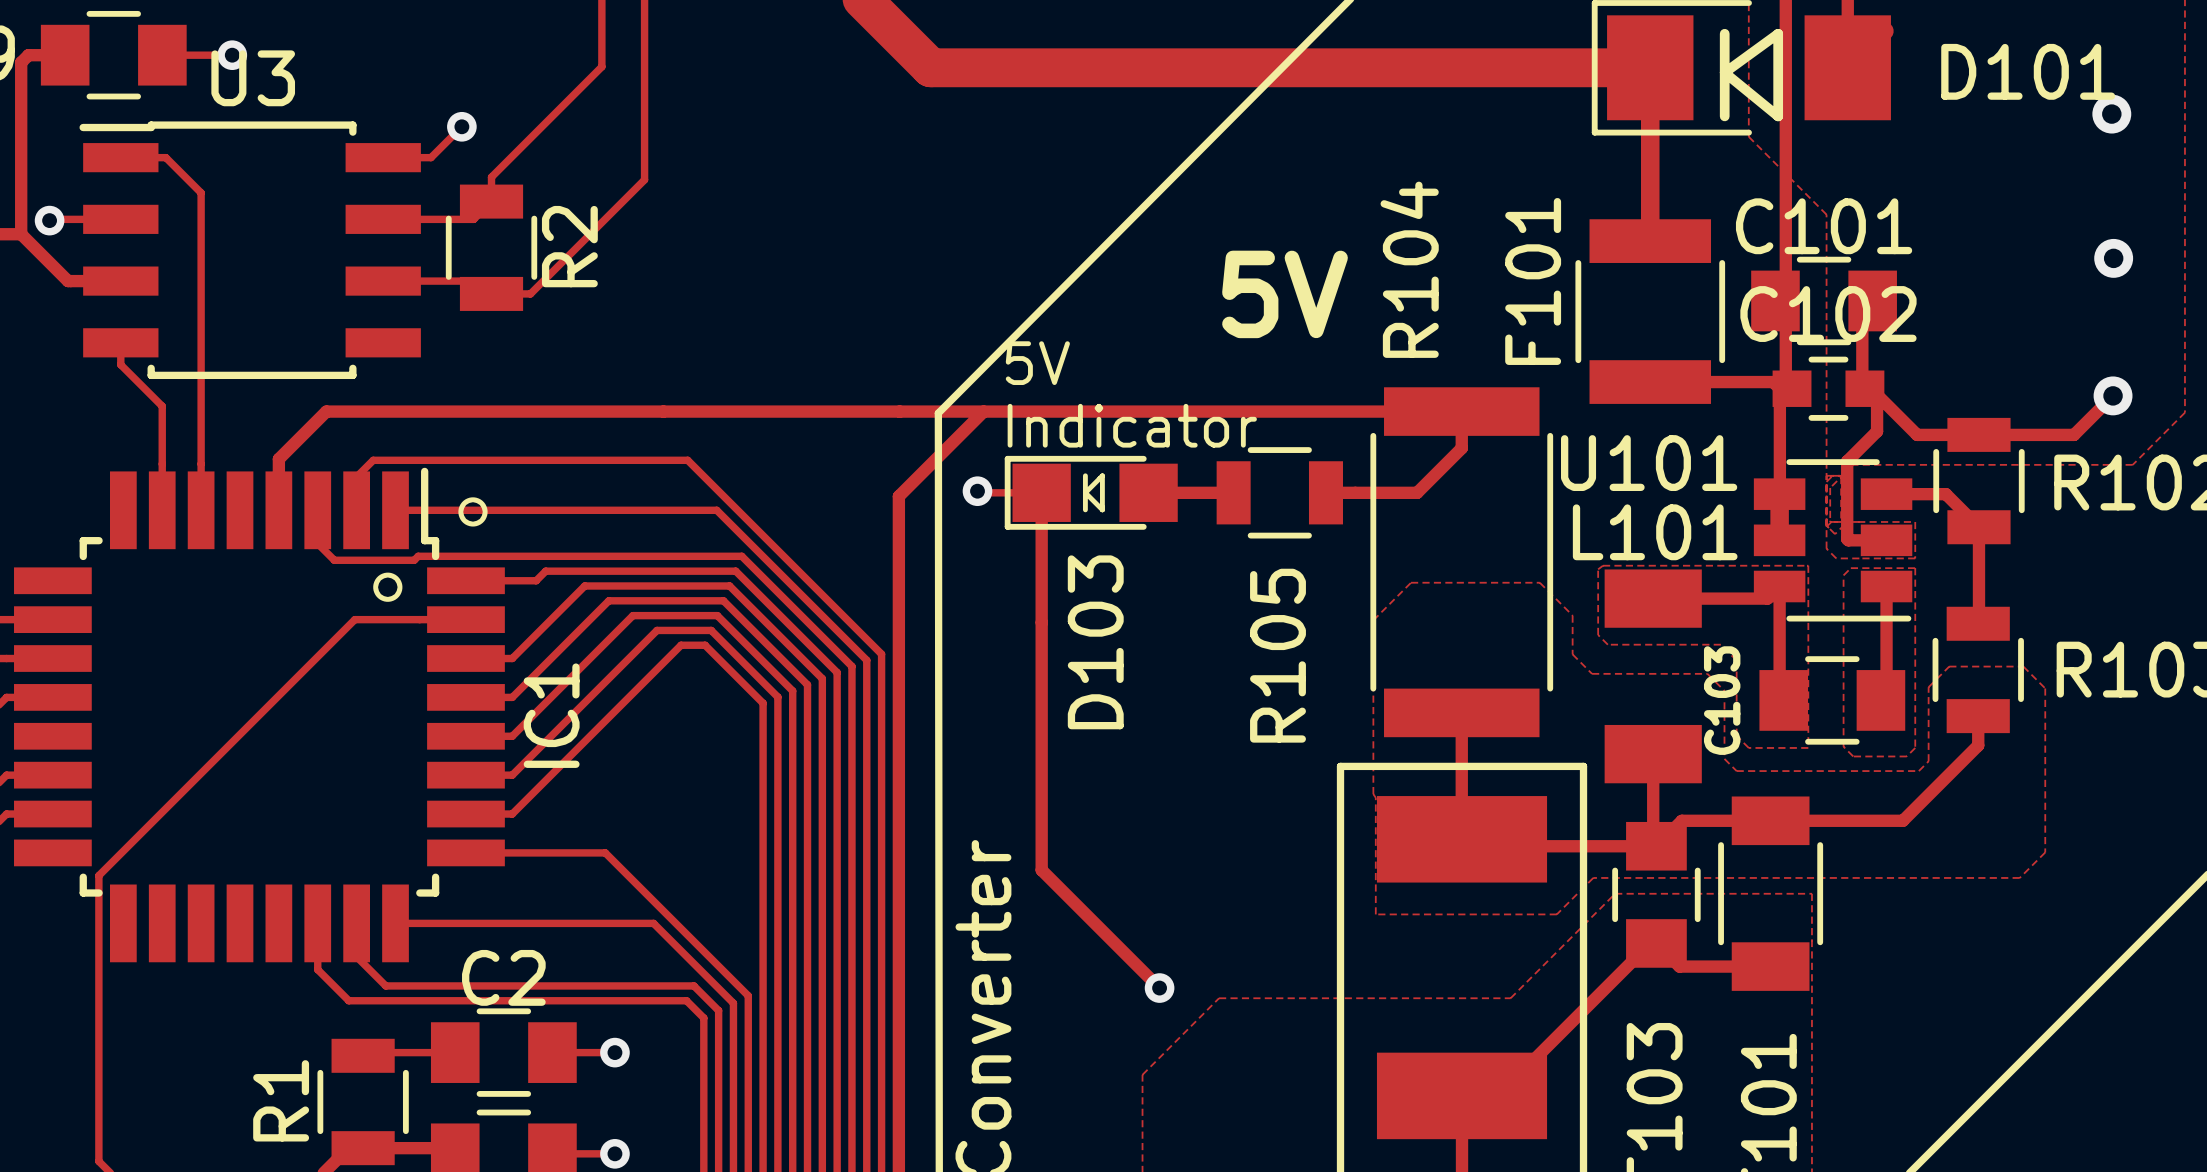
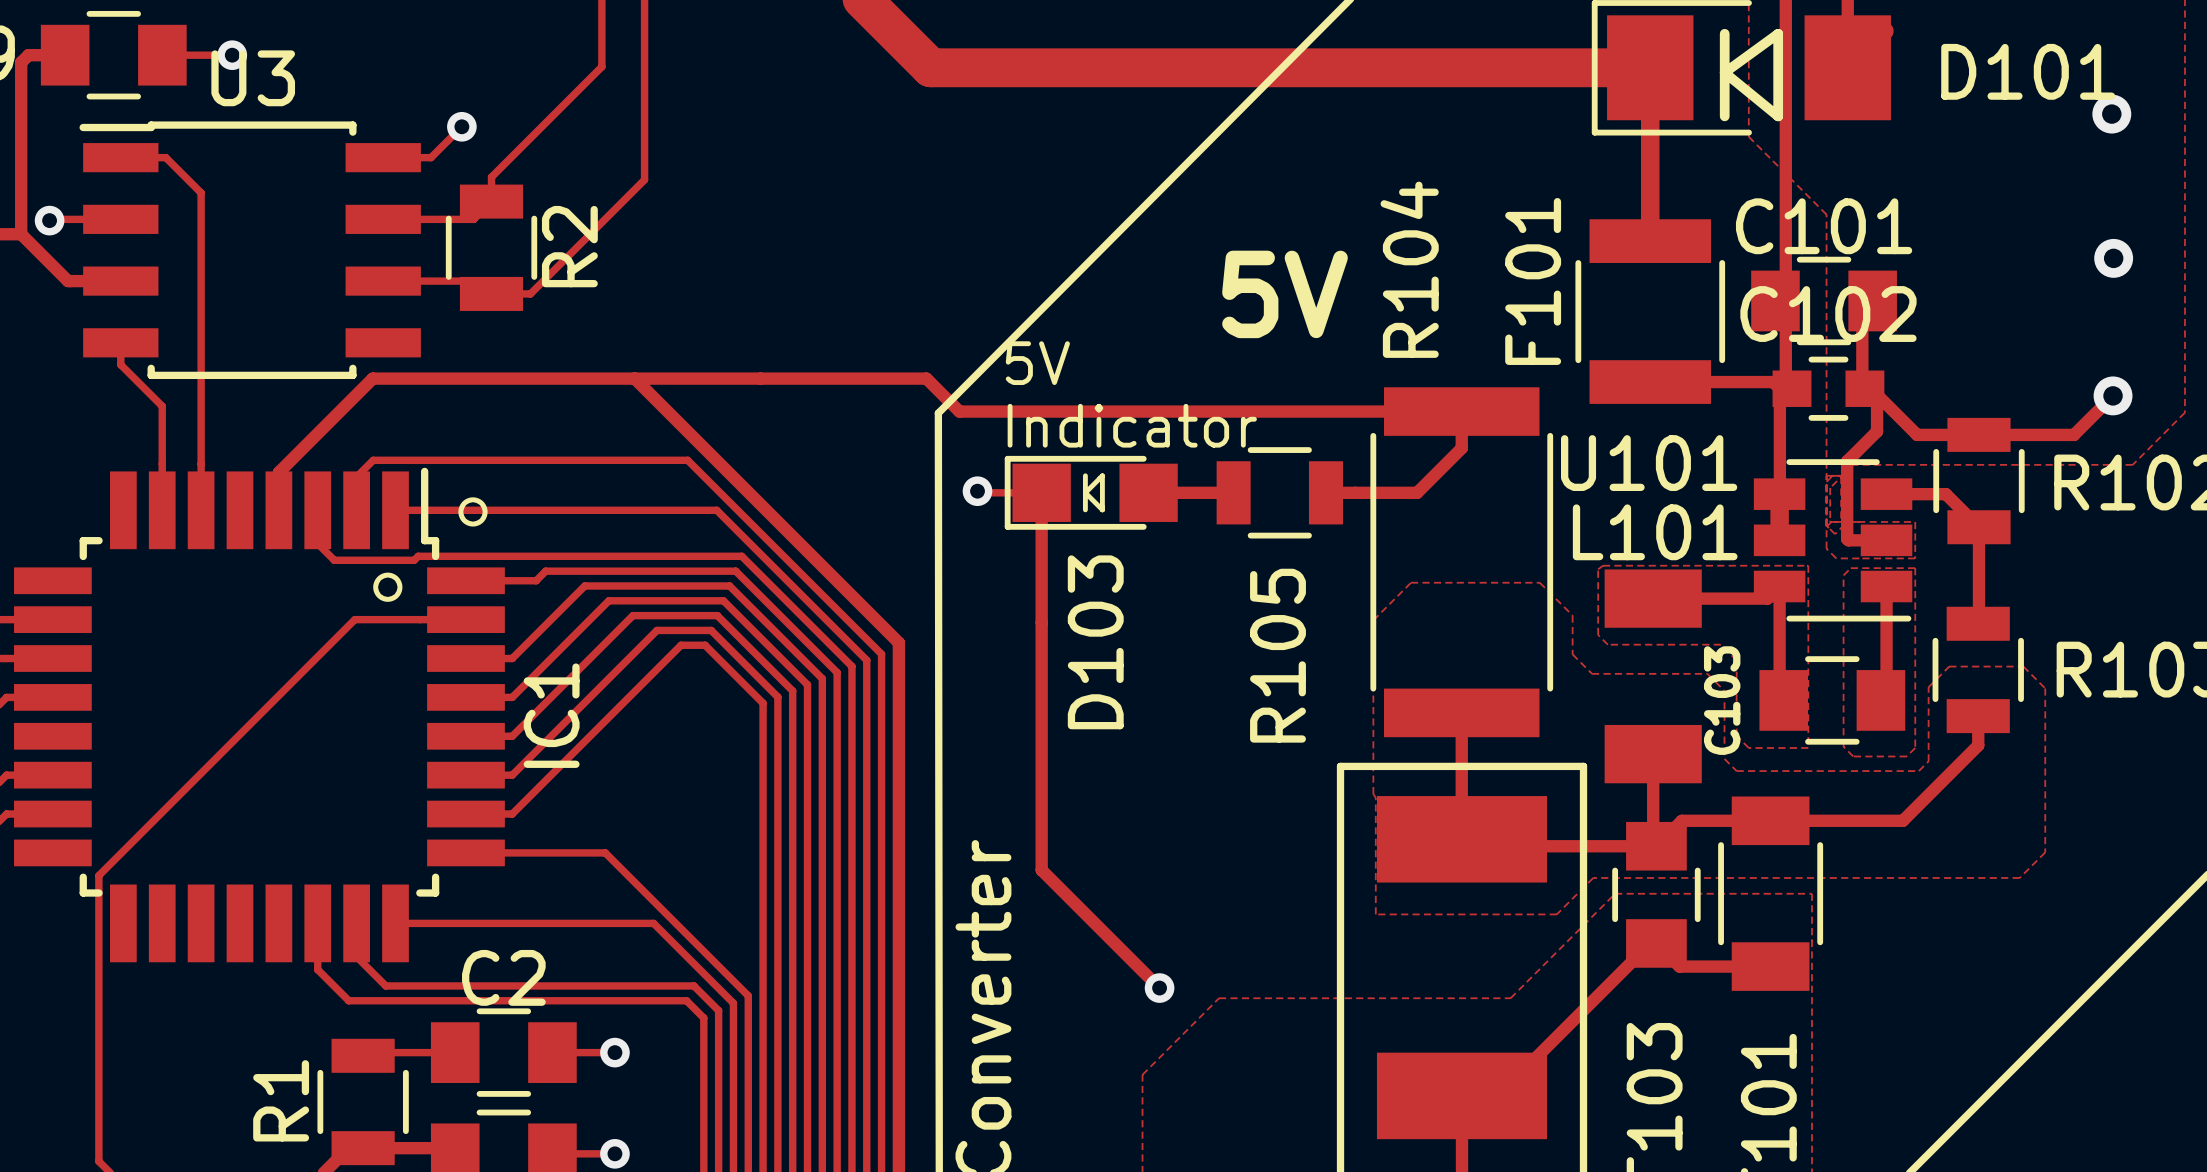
track: (959, 411) (326, 411) (278, 459) (278, 472) -> (959, 411) (926, 378) (372, 378) (278, 472)
track: (983, 411) (898, 496) (898, 642) -> (634, 378) (898, 642)

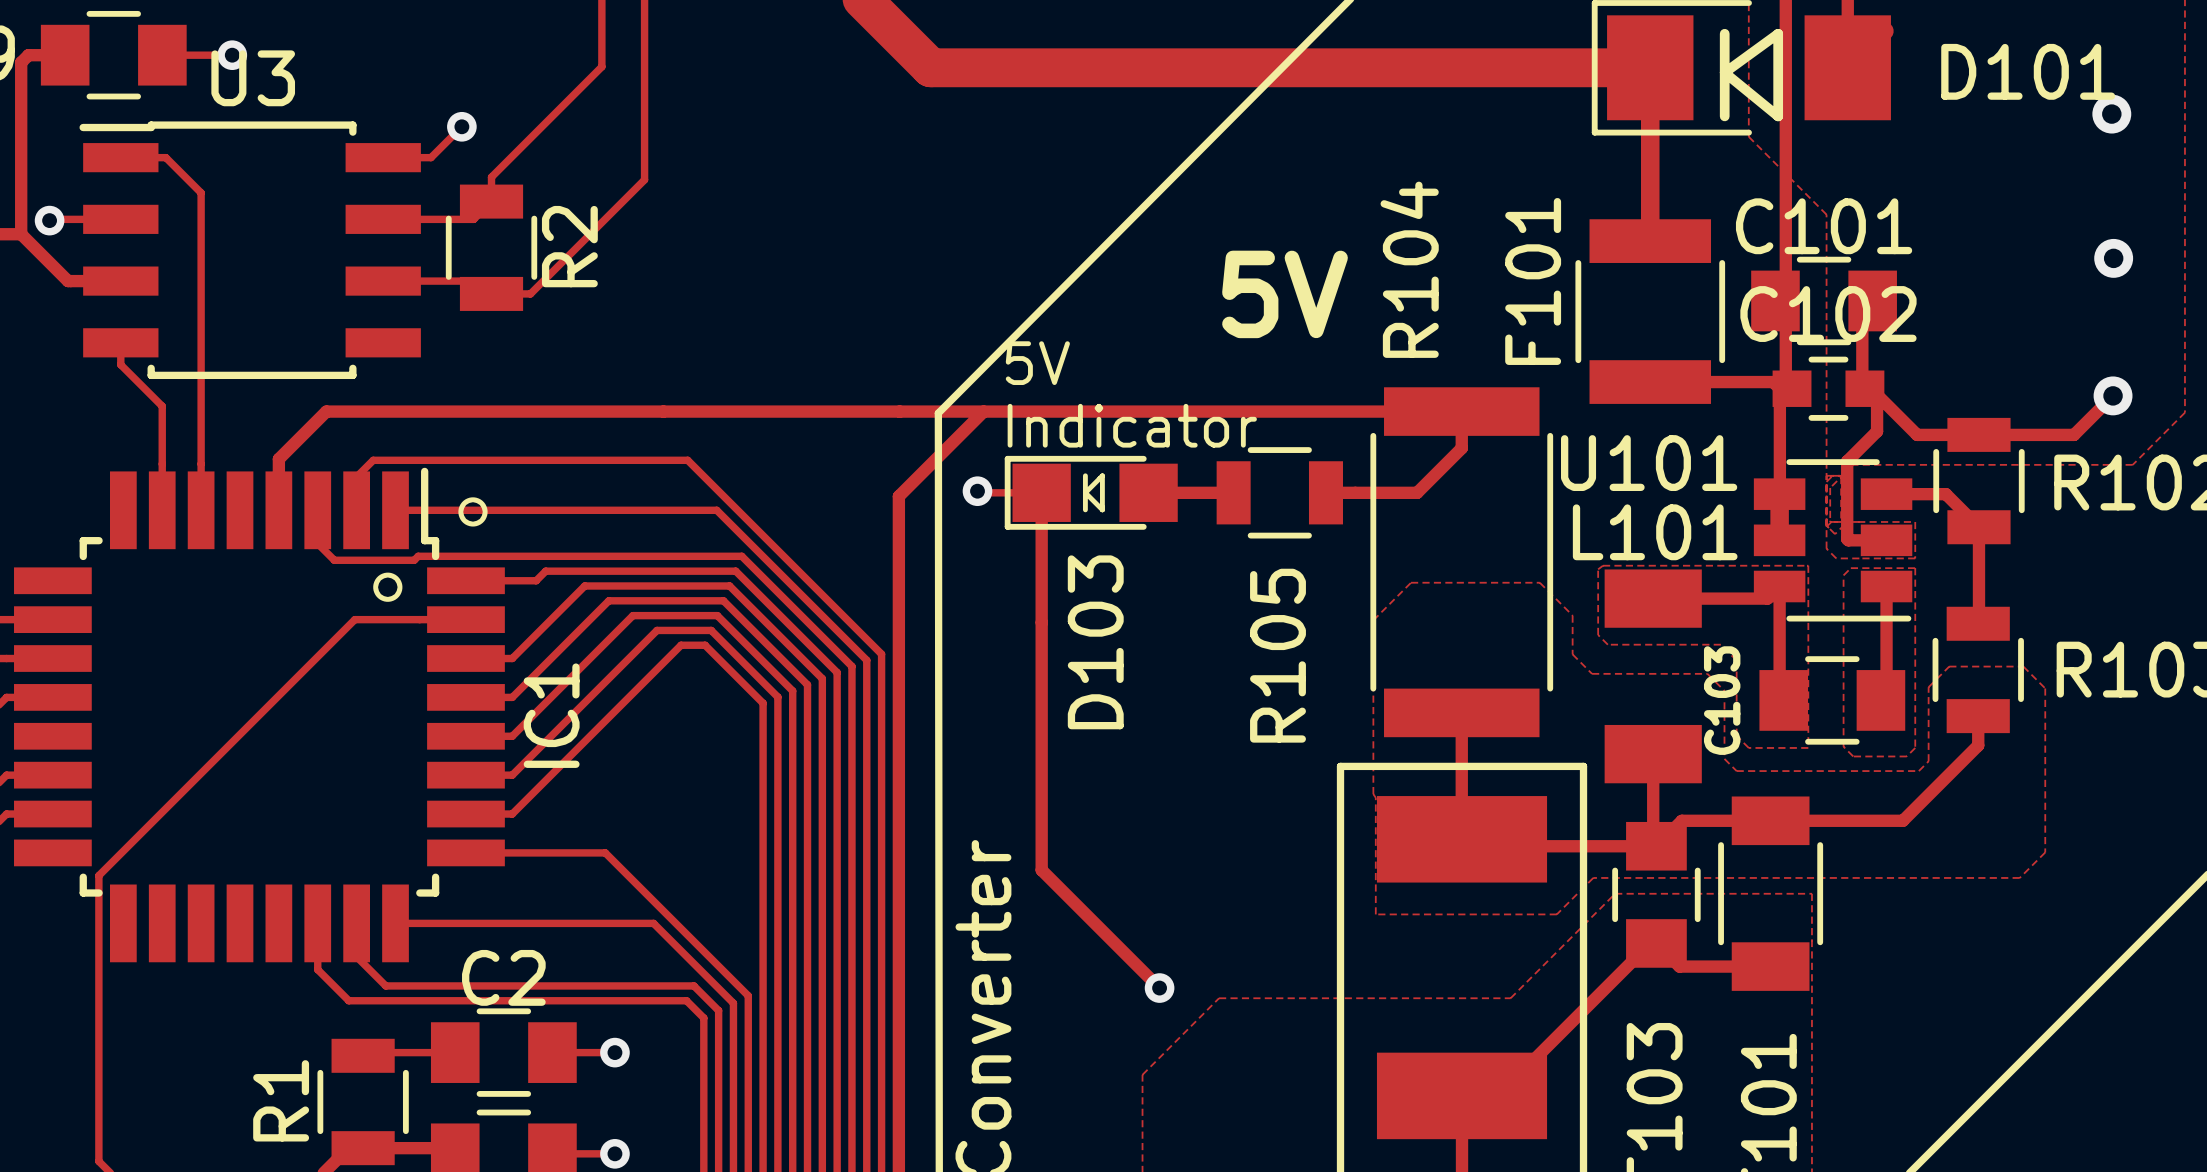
track: (634, 378) (898, 642) -> (983, 411) (898, 496) (898, 642)
track: (959, 411) (926, 378) (372, 378) (278, 472) -> (959, 411) (326, 411) (278, 459) (278, 472)

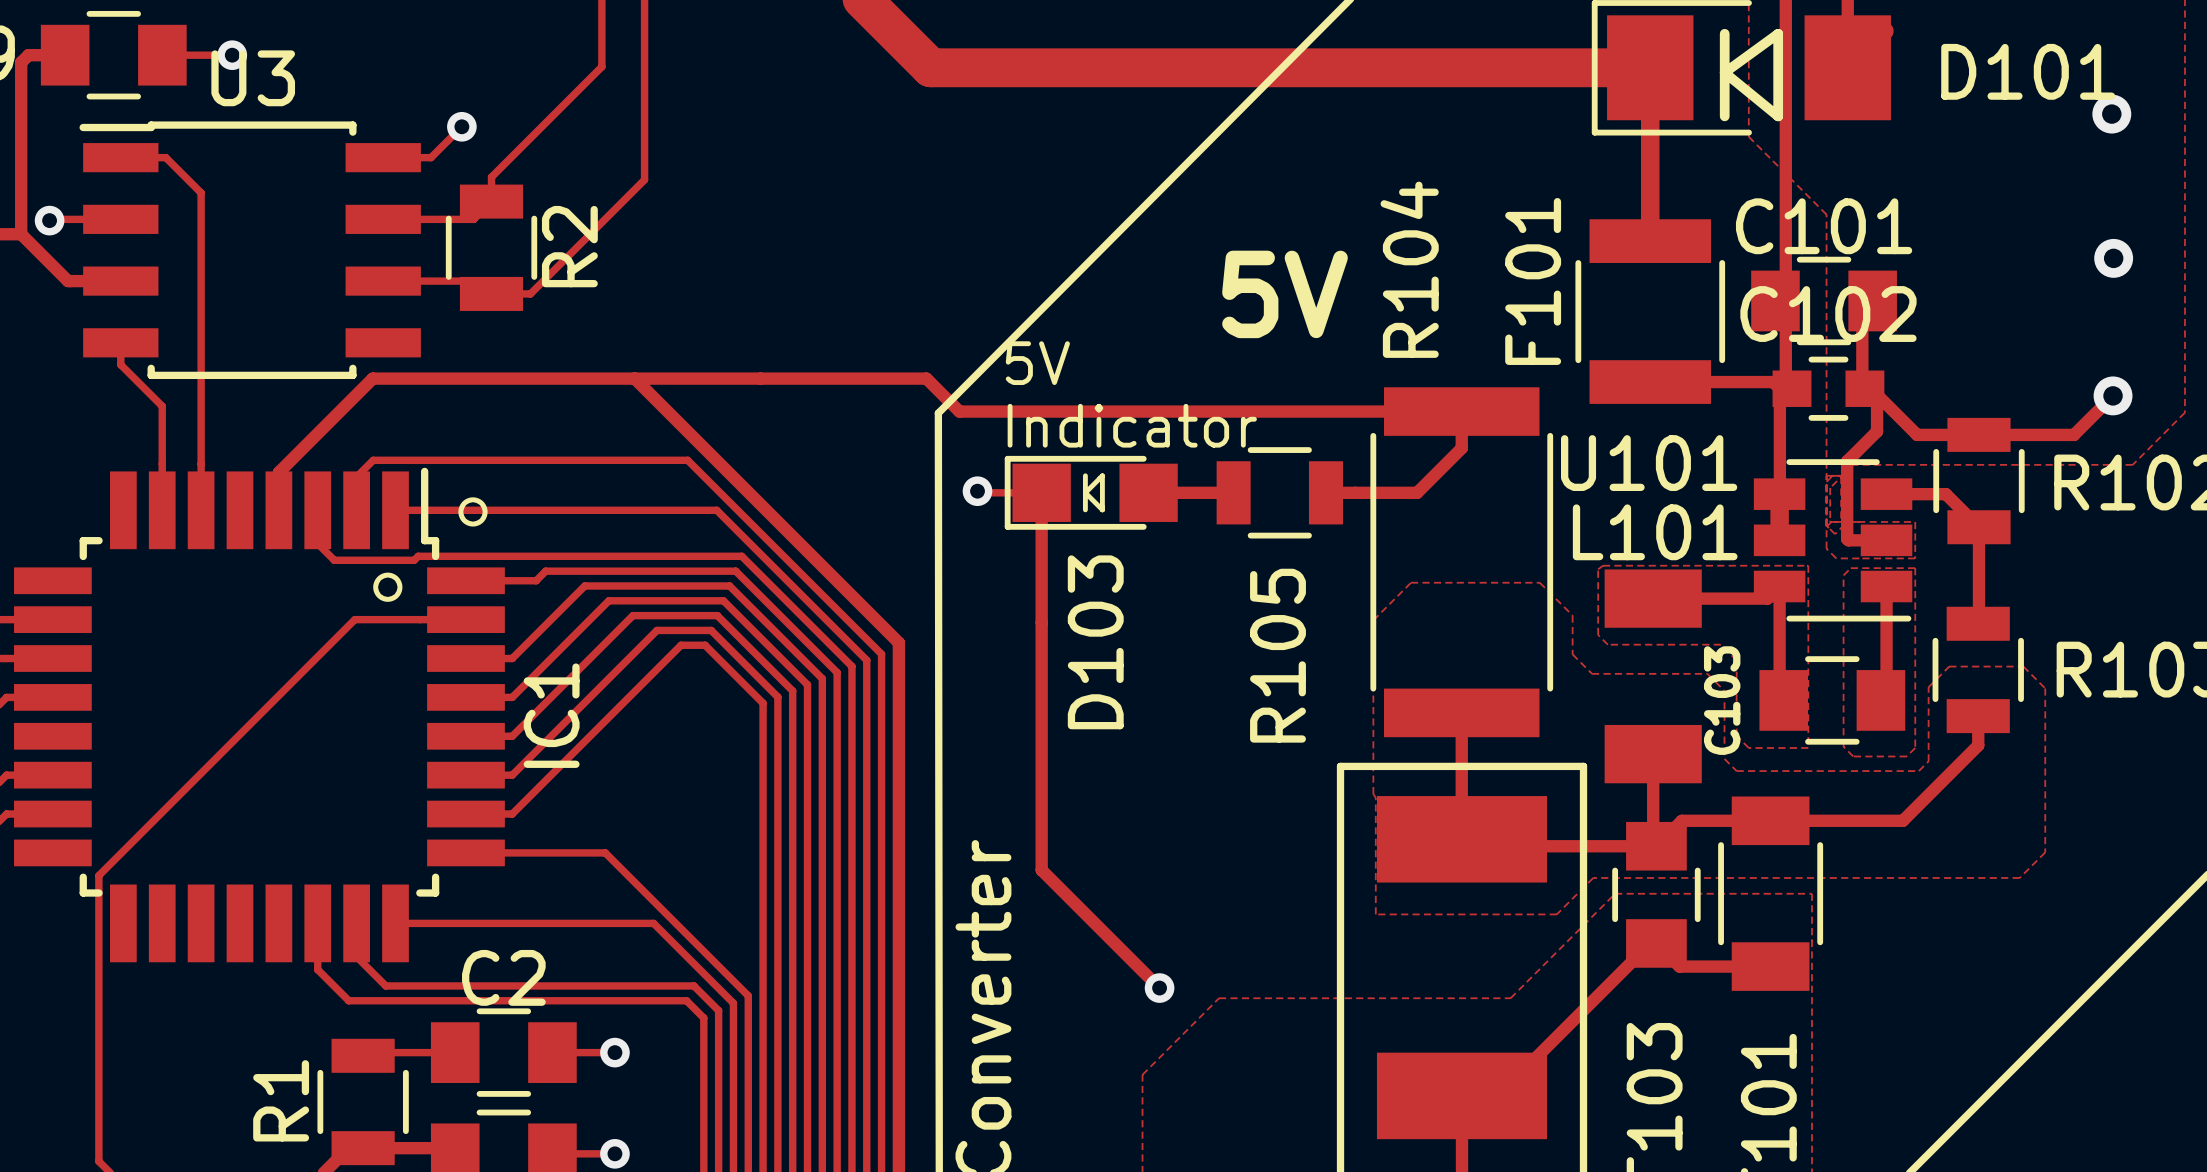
track: (959, 411) (326, 411) (278, 459) (278, 472) -> (959, 411) (926, 378) (372, 378) (278, 472)
track: (983, 411) (898, 496) (898, 642) -> (634, 378) (898, 642)

